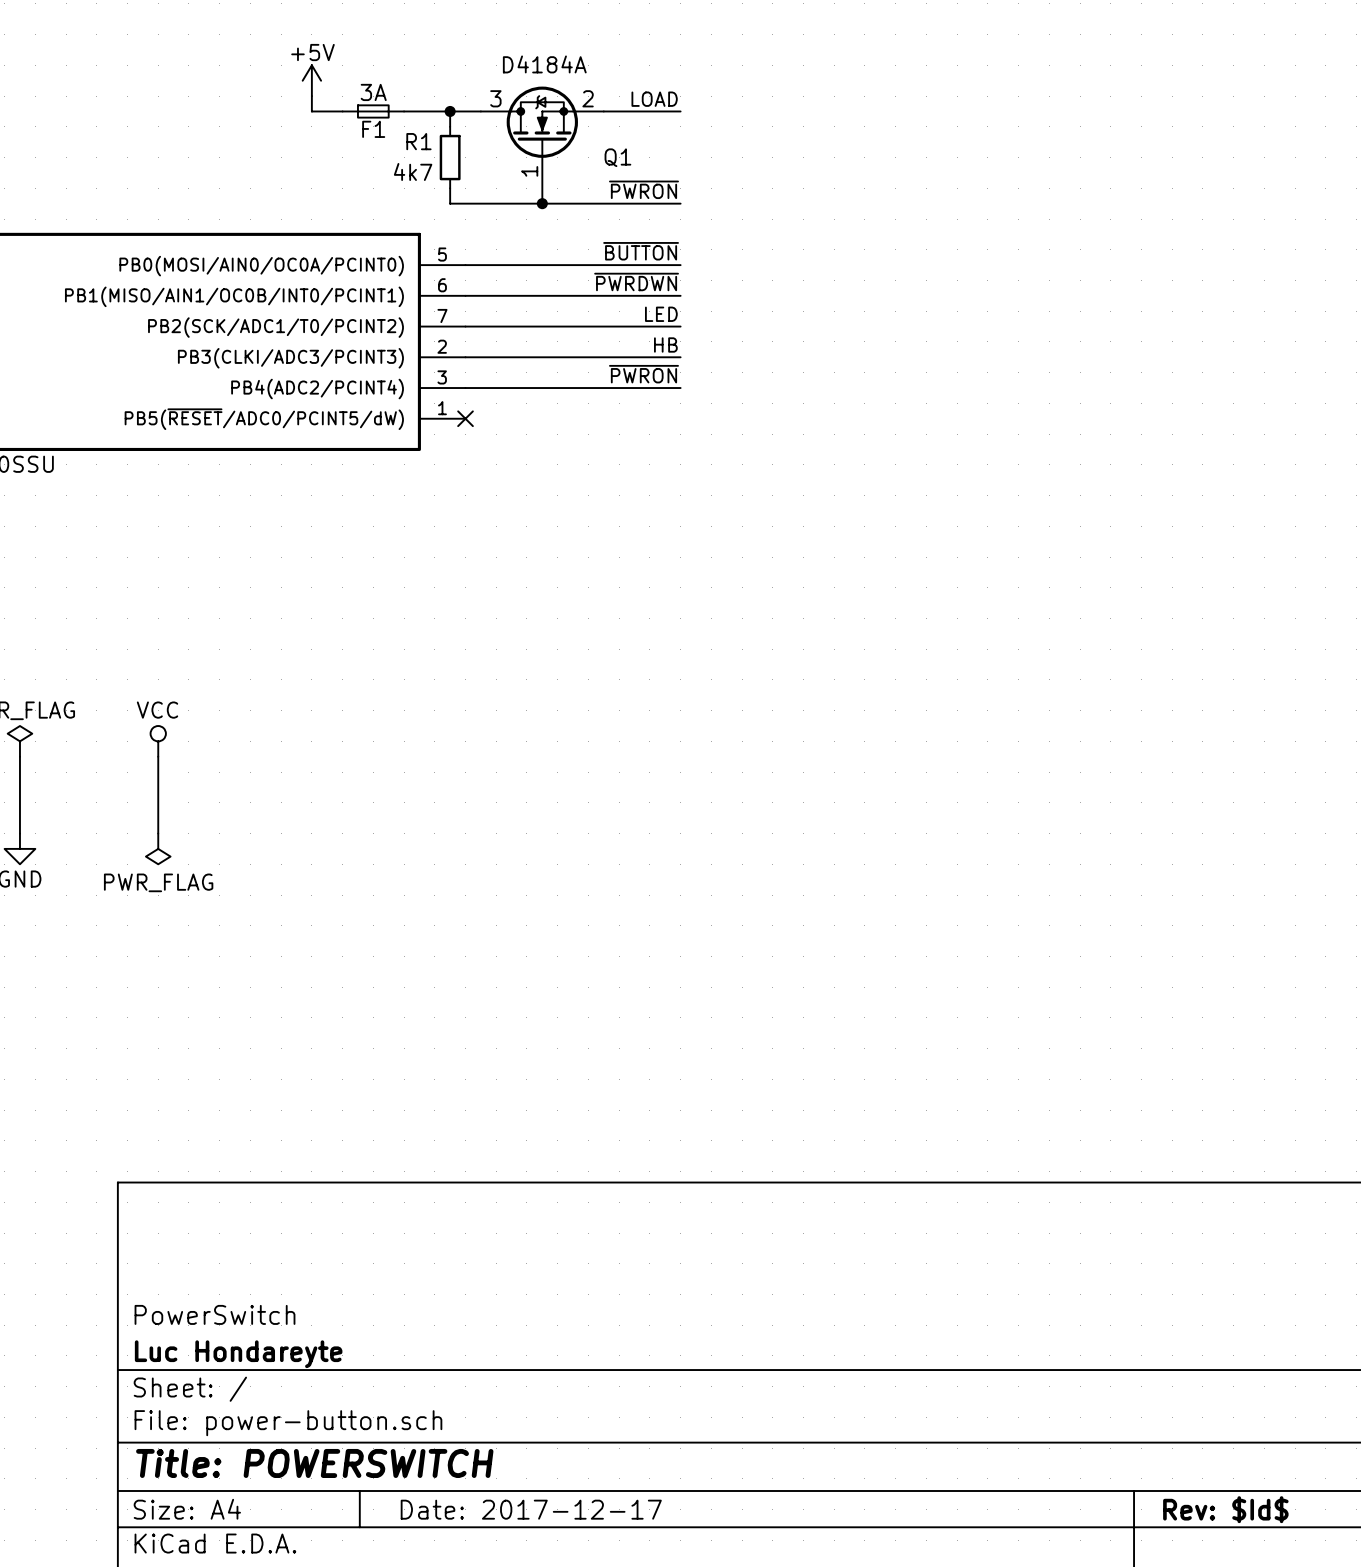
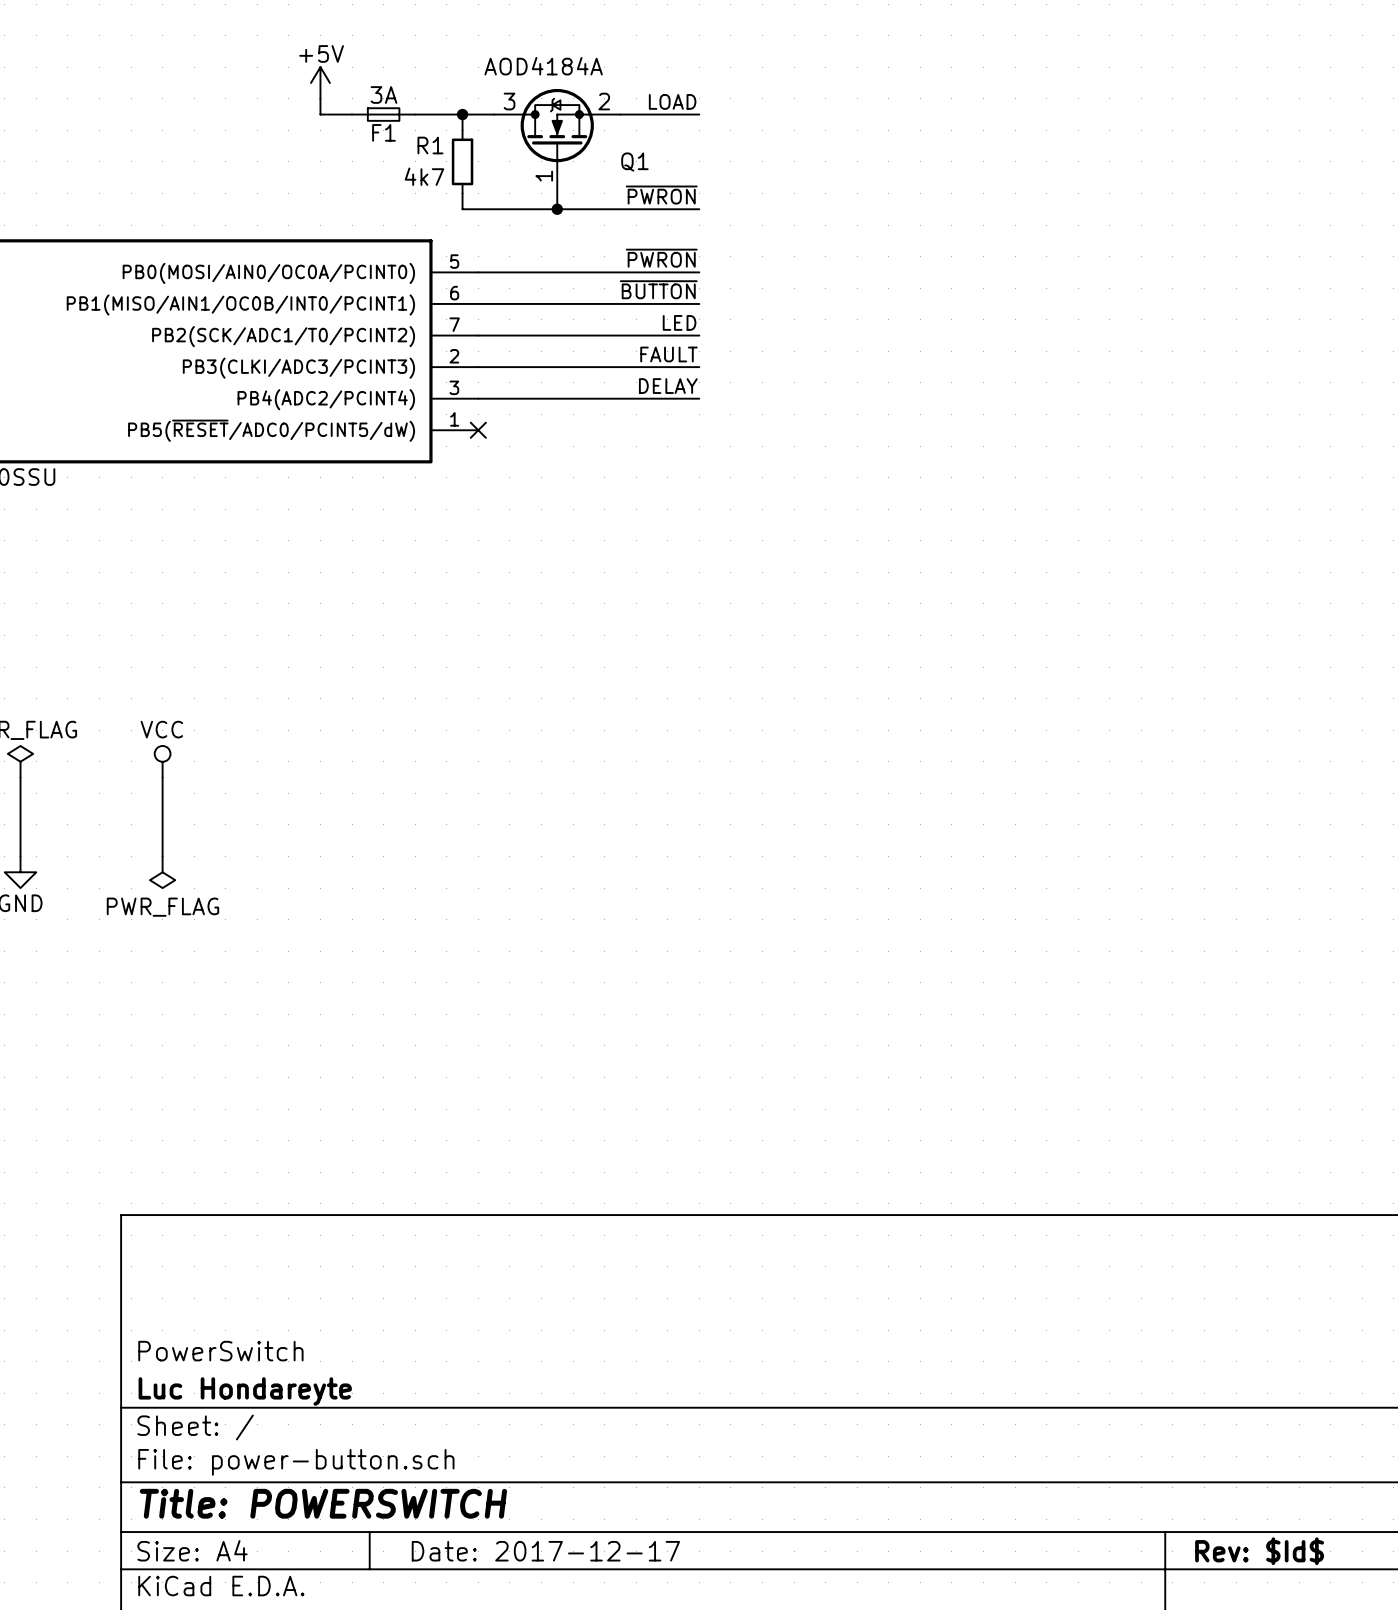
Q1 value: D4184A (544, 64) -> AOD4184A (543, 66)
label: ~{BUTTON} (641, 251) -> ~{PWRON} (661, 258)
label: ~{PWRDWN} (636, 281) -> ~{BUTTON} (658, 289)
label: HB (665, 345) -> FAULT (668, 354)
label: ~{PWRON} (643, 374) -> DELAY (668, 386)

